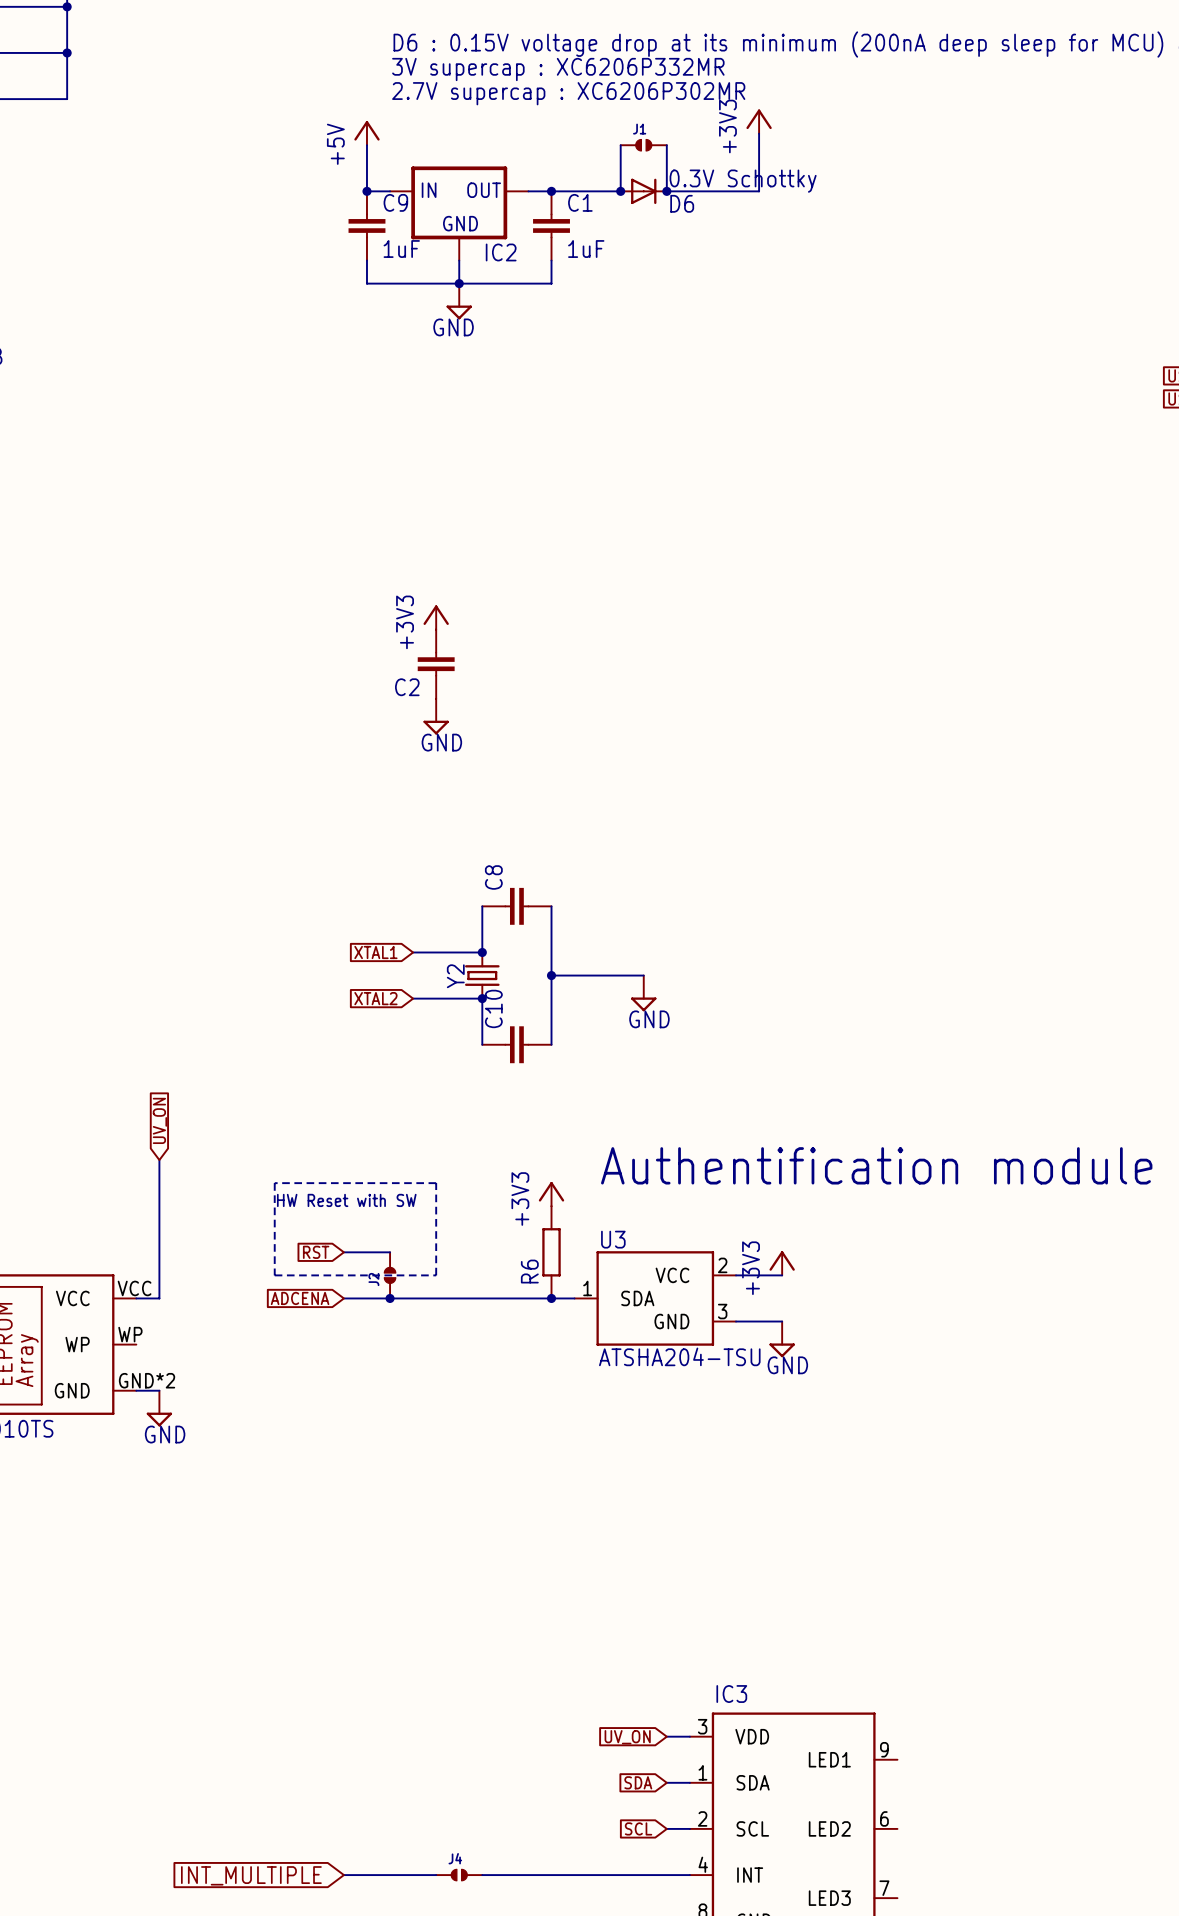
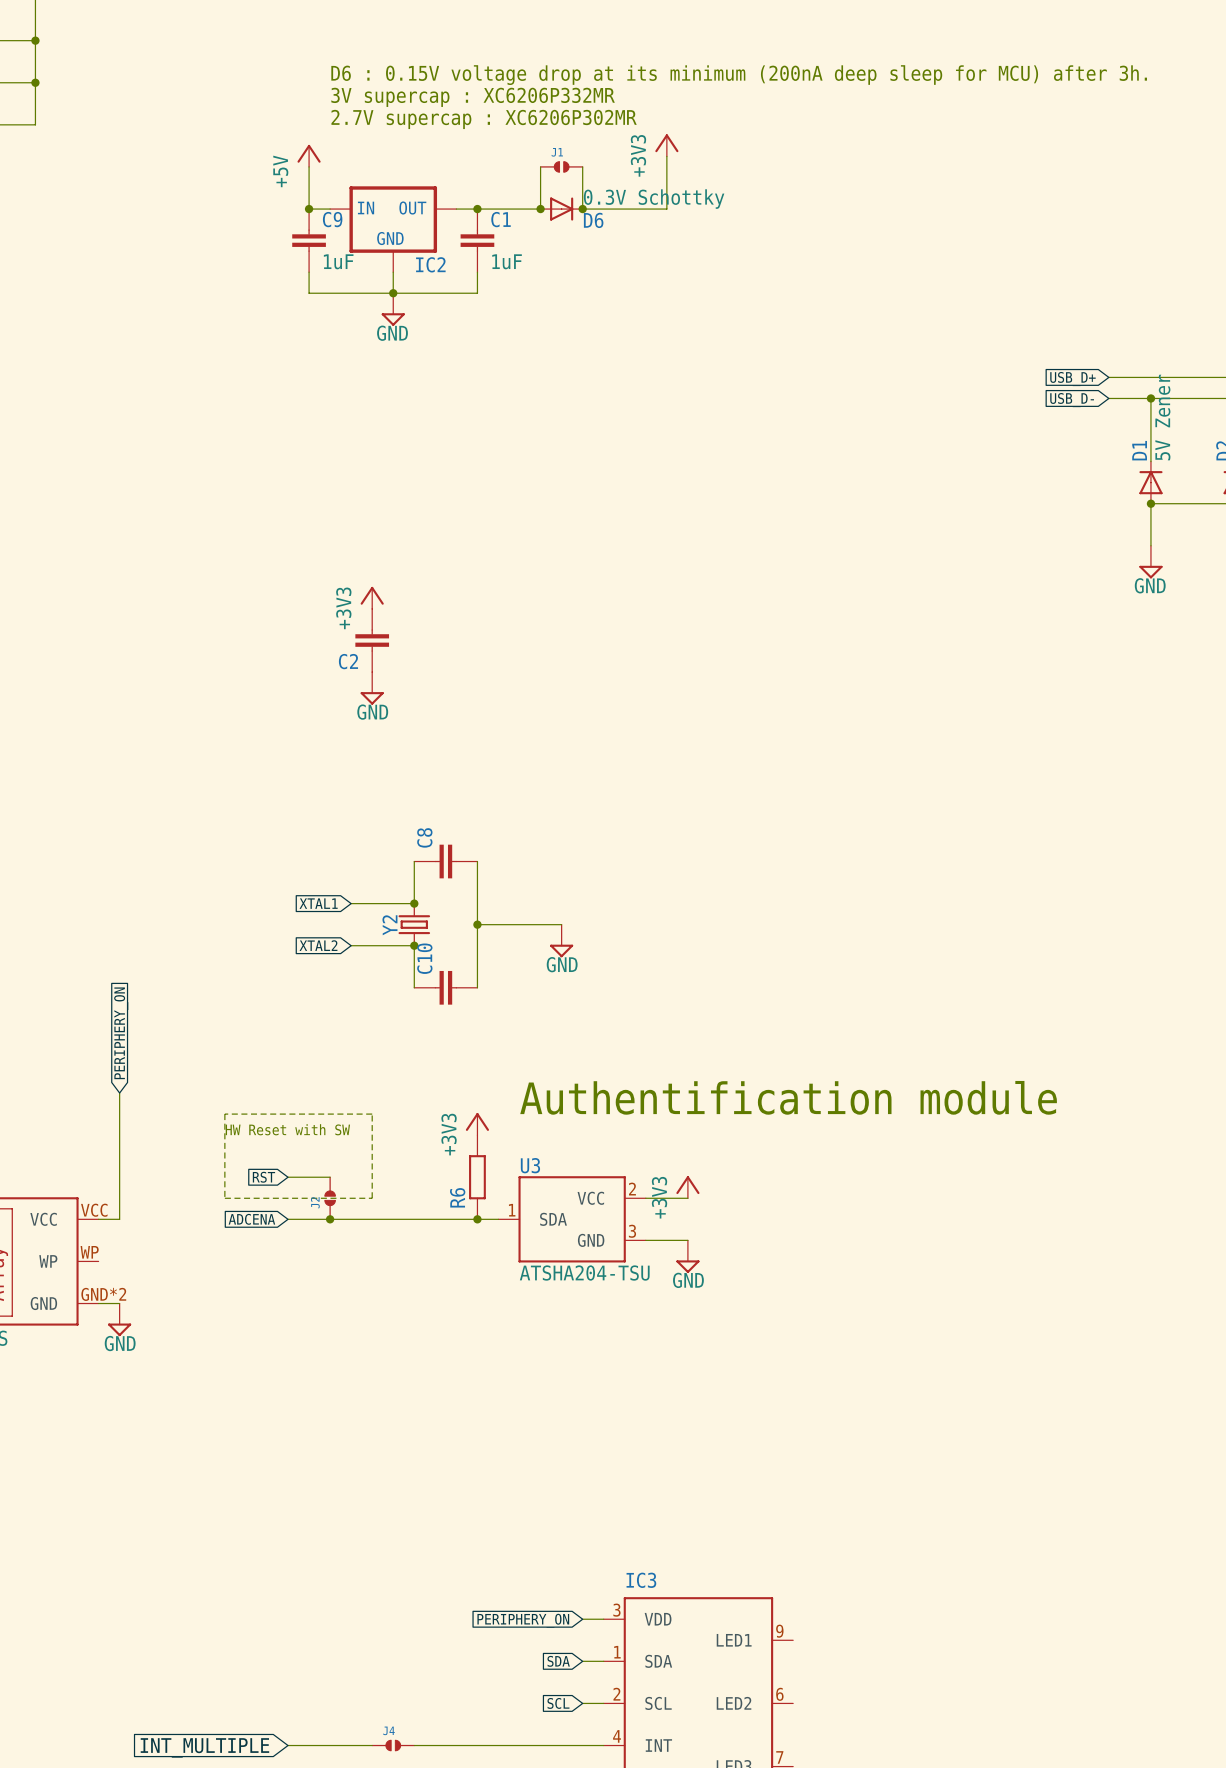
global label: UV_ON (159, 1120) -> PERIPHERY_ON (121, 1033)
global label: UV_ON (627, 1737) -> PERIPHERY_ON (523, 1620)

